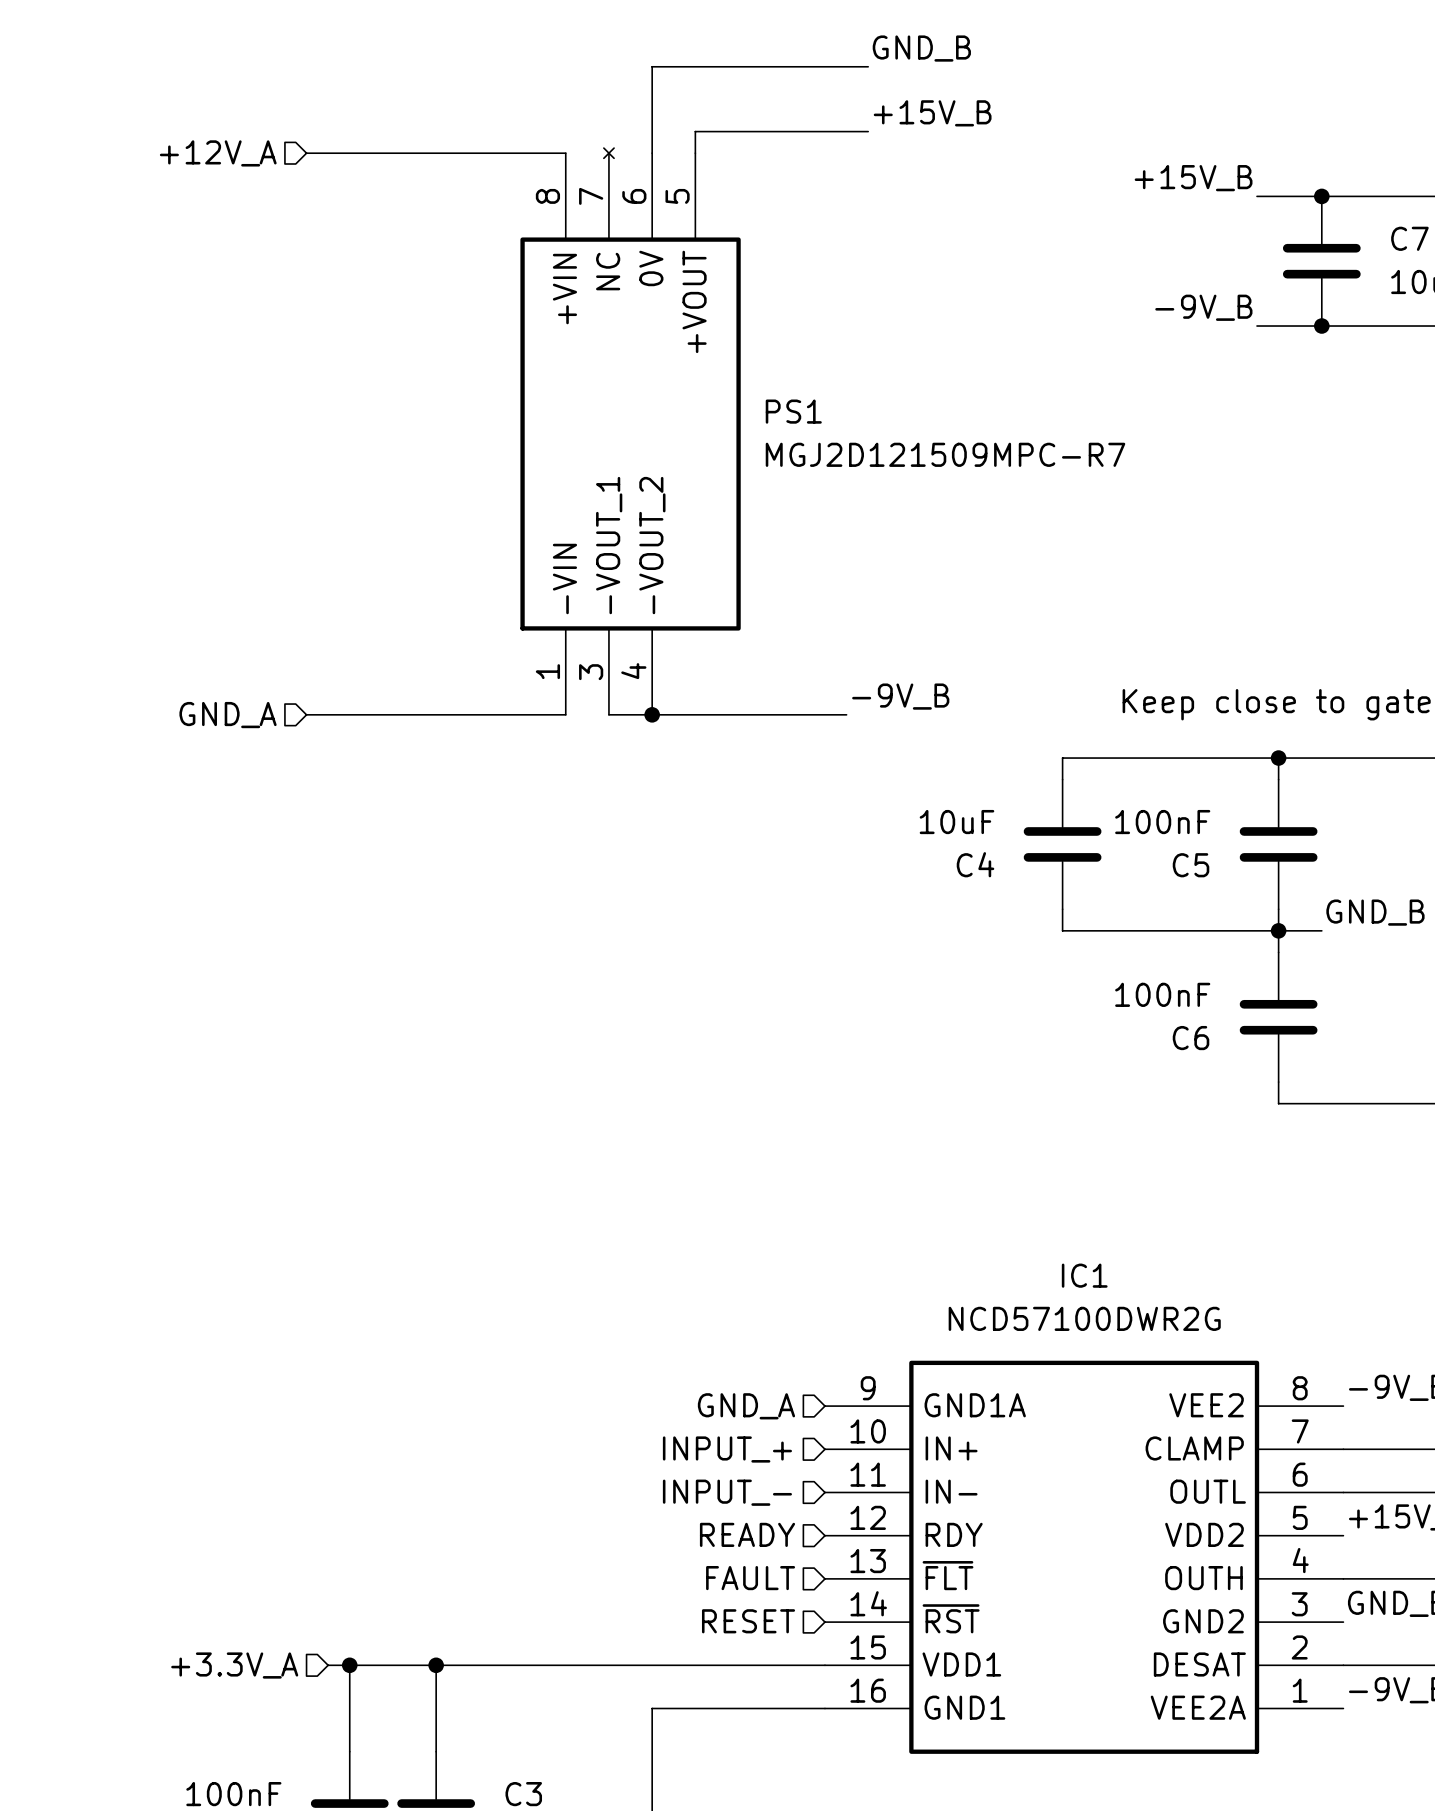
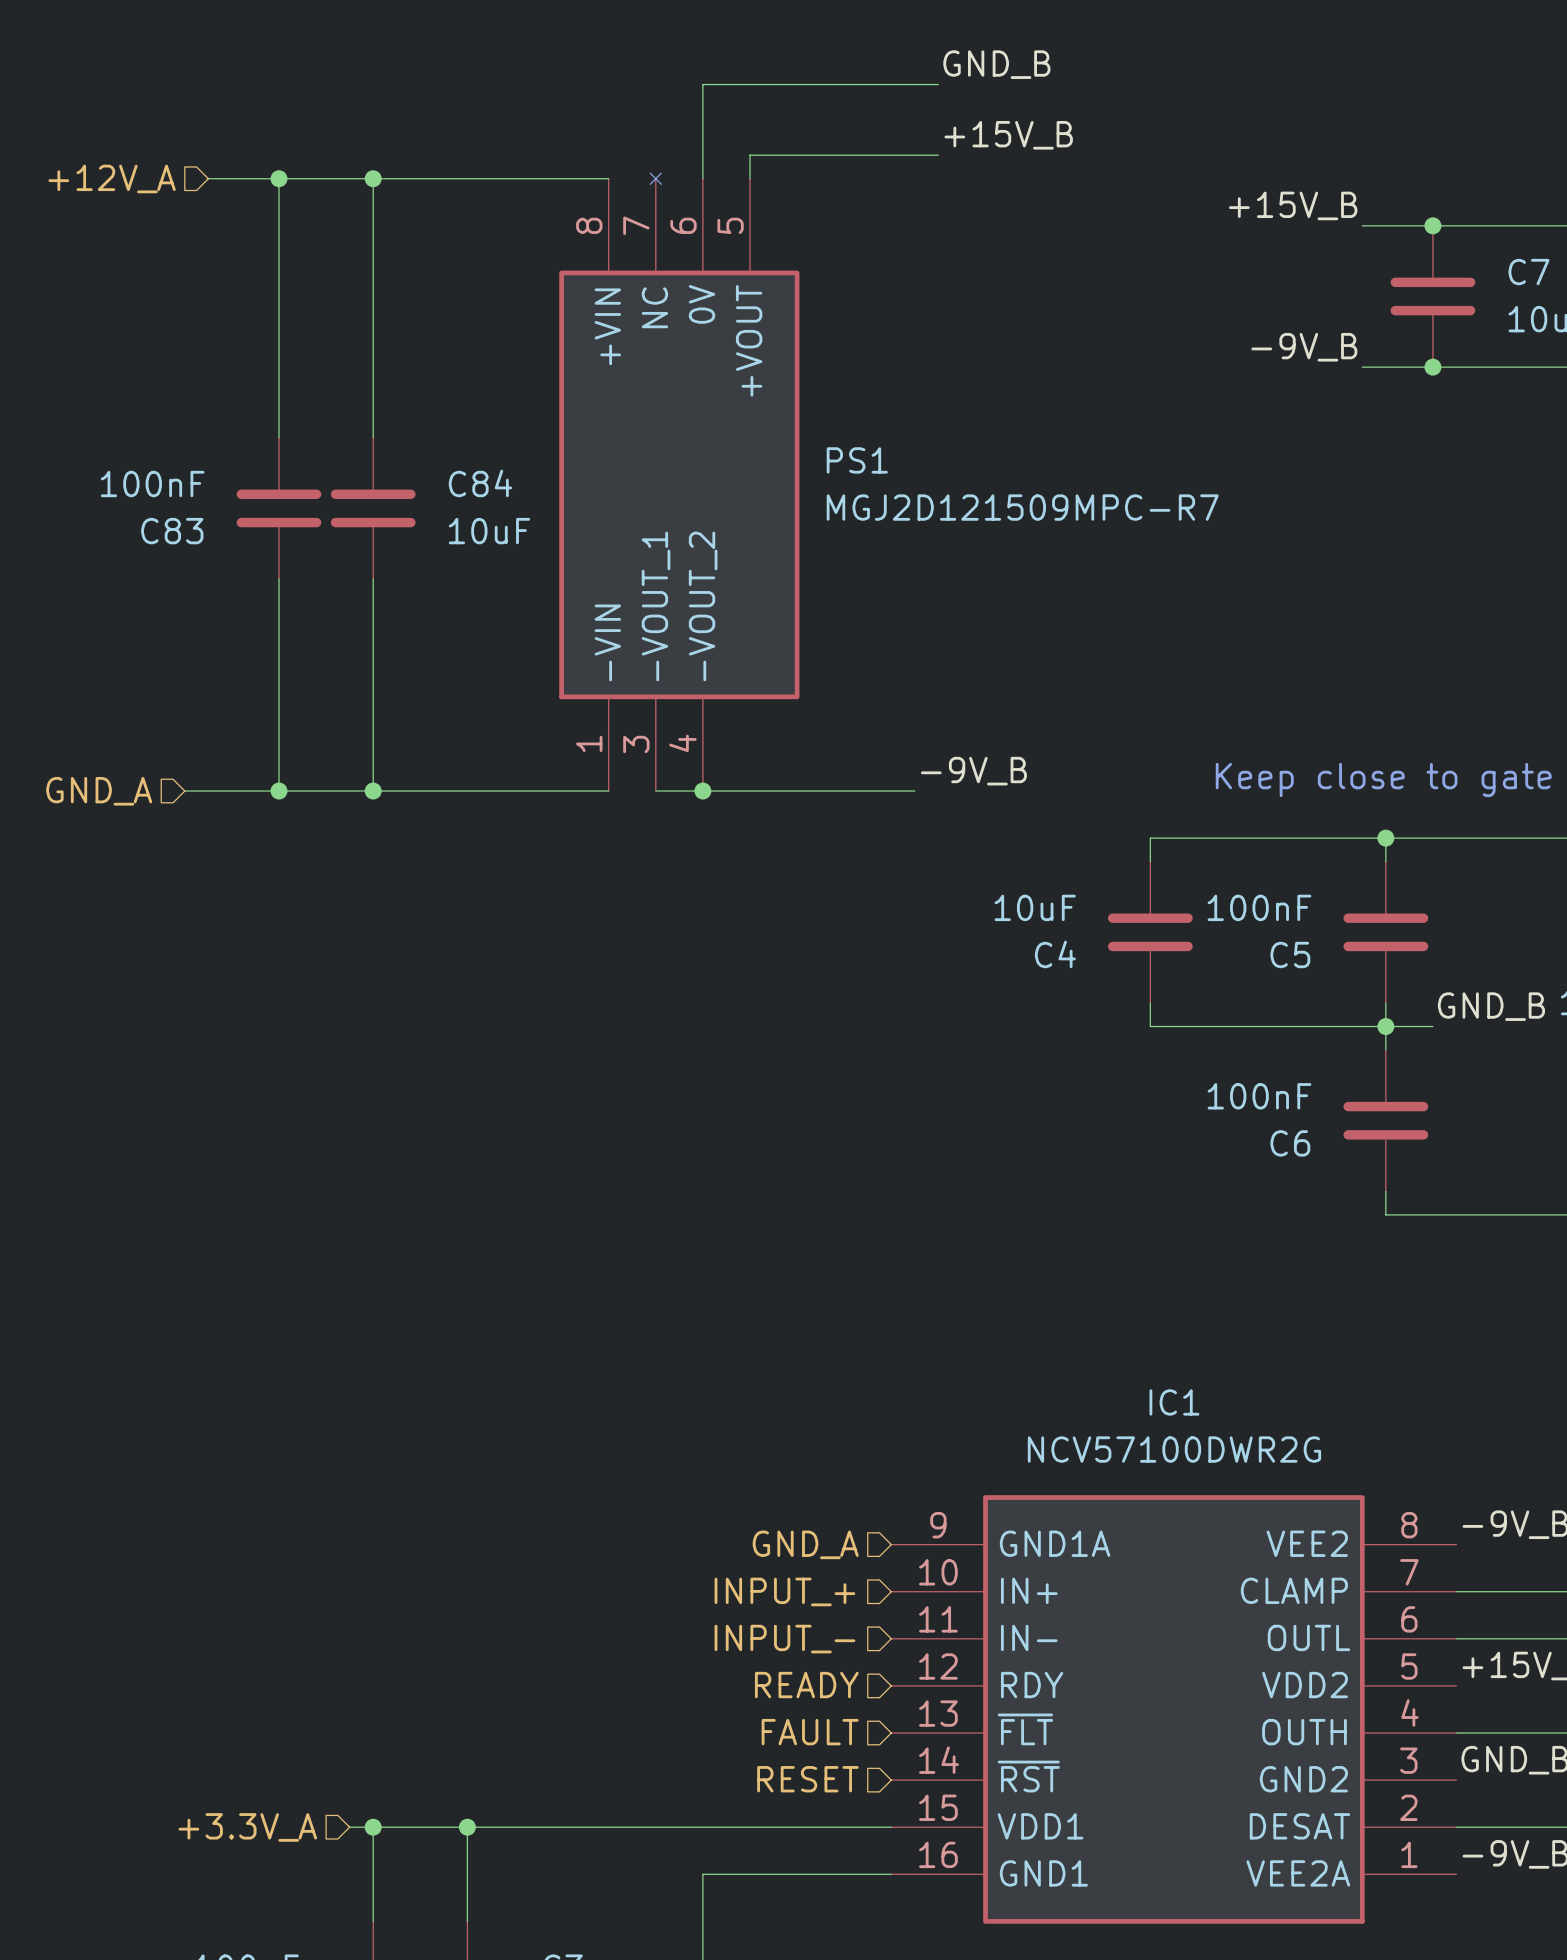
wire: none -> (208, 178) (326, 178)
hierarchical label position: +12V_A (218, 153) -> +12V_A (112, 178)
wire: none -> (279, 178) (279, 437)
junction: none -> (279, 178)
wire: none -> (373, 178) (373, 437)
junction: none -> (373, 178)
C83: none -> 100nF (279, 508)
C84: none -> 10uF (373, 508)
wire: none -> (279, 579) (279, 791)
wire: none -> (373, 579) (373, 791)
wire: none -> (184, 791) (326, 791)
junction: none -> (279, 791)
junction: none -> (373, 791)
hierarchical label position: GND_A (228, 715) -> GND_A (99, 791)
IC1 value: NCD57100DWR2G (1084, 1318) -> NCV57100DWR2G (1174, 1449)

